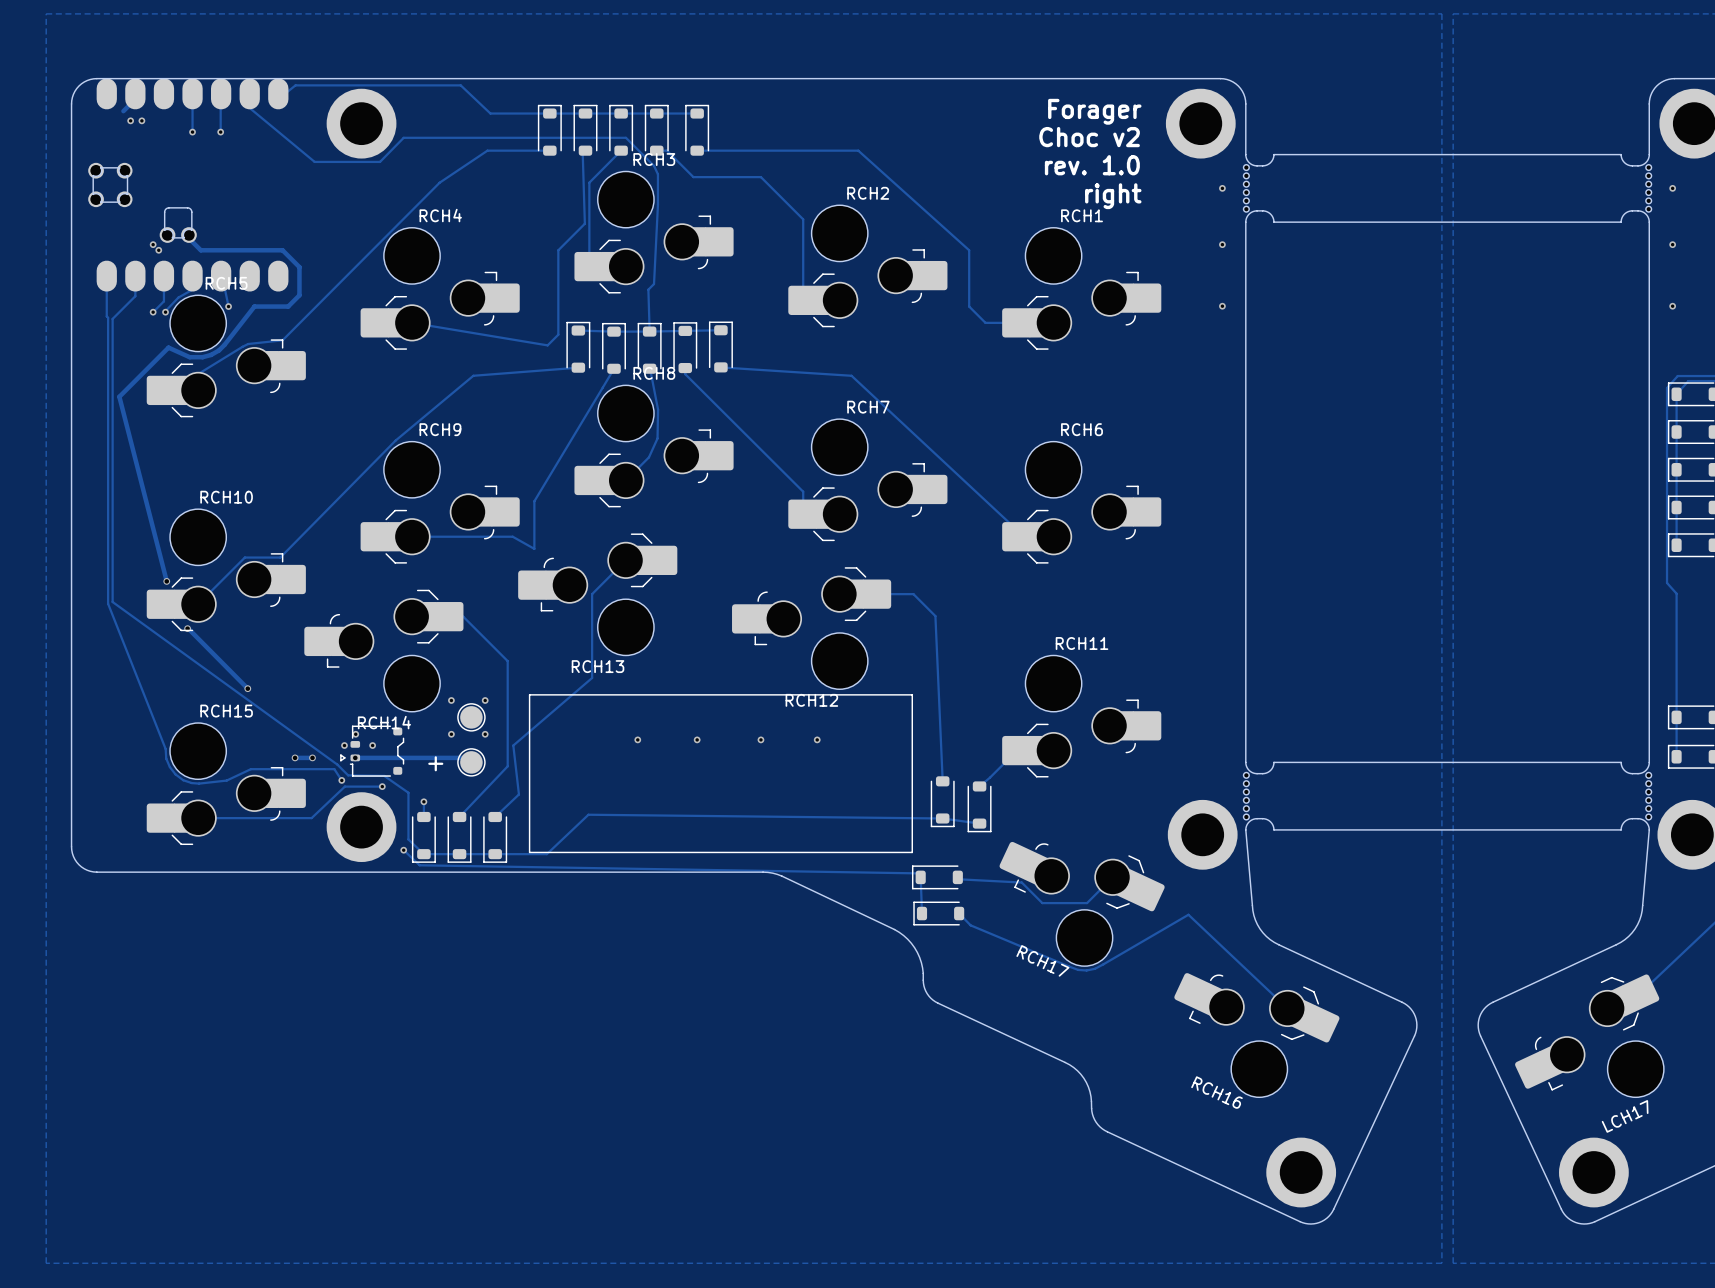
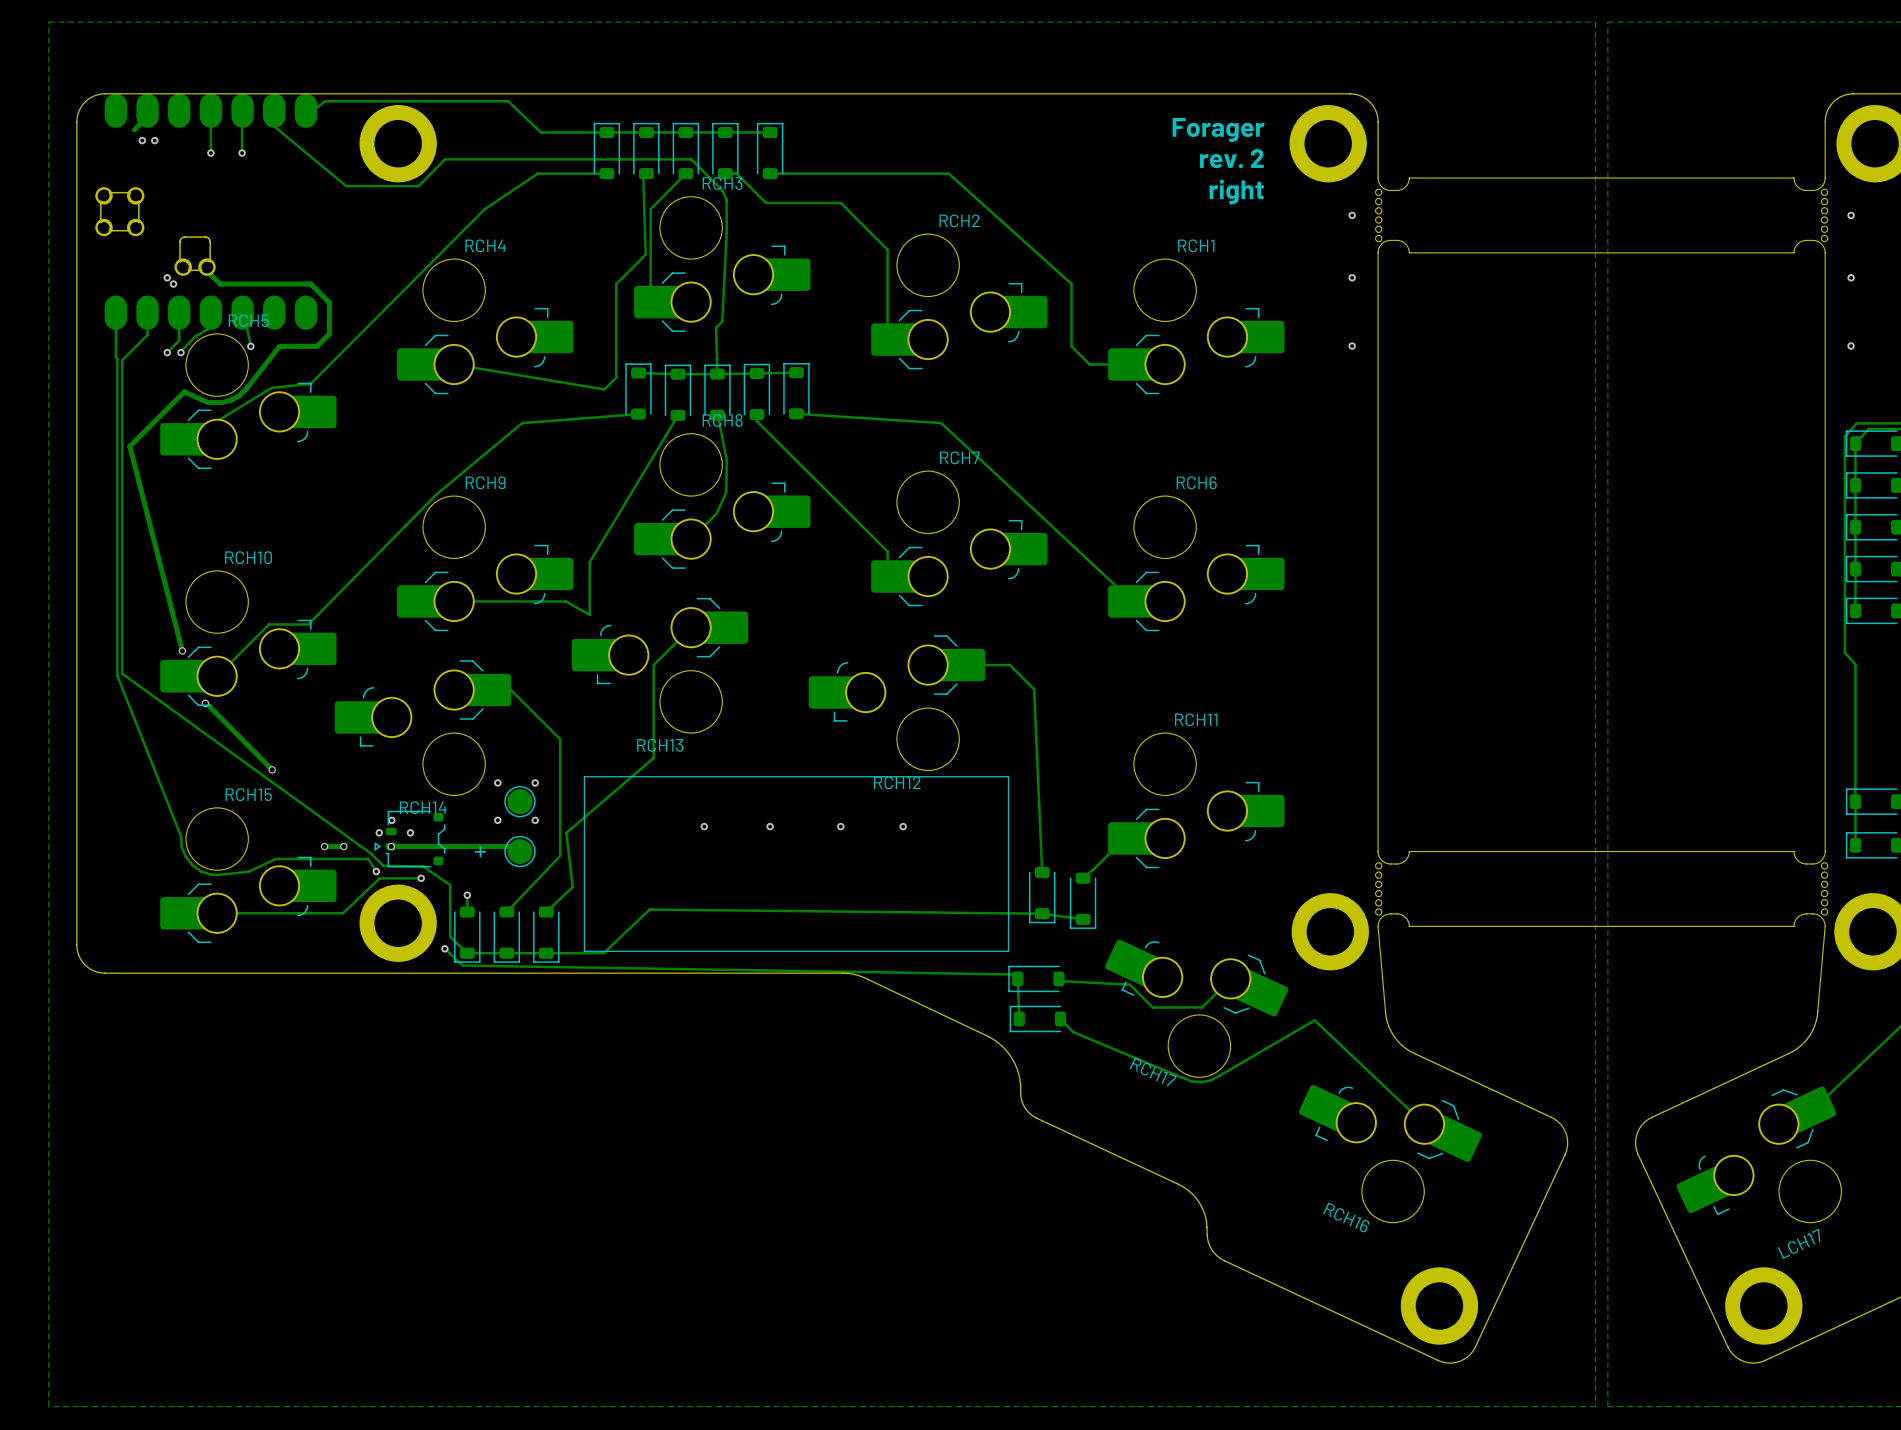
text: Choc v2 (1089, 137) -> rev. 2 (1231, 158)
text: rev. 1.0 (1092, 165) -> right (1236, 192)
text: right (1113, 196) -> none

